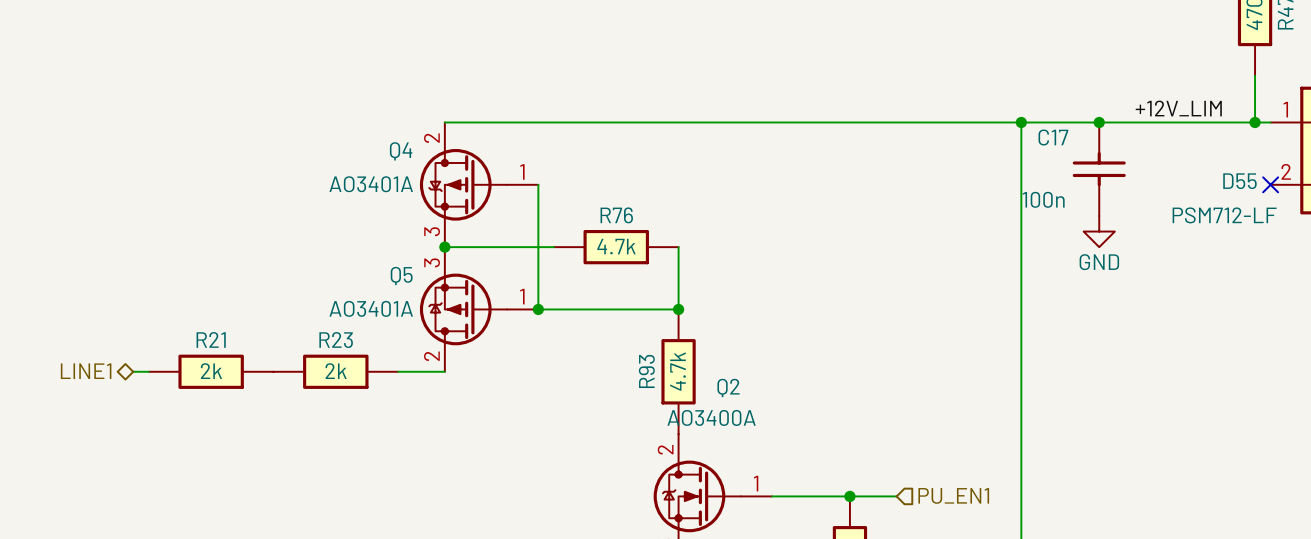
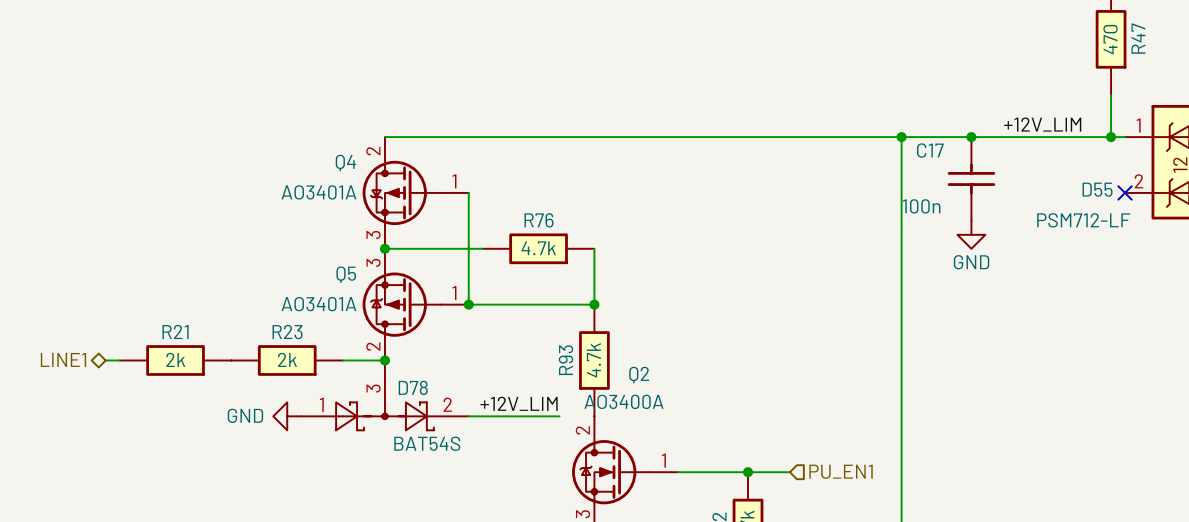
junction: none -> (384, 360)
D78: none -> BAT54S (384, 395)
label: none -> +12V_LIM (519, 403)
power symbol: none -> GND (287, 416)
wire: none -> (468, 416) (559, 416)

